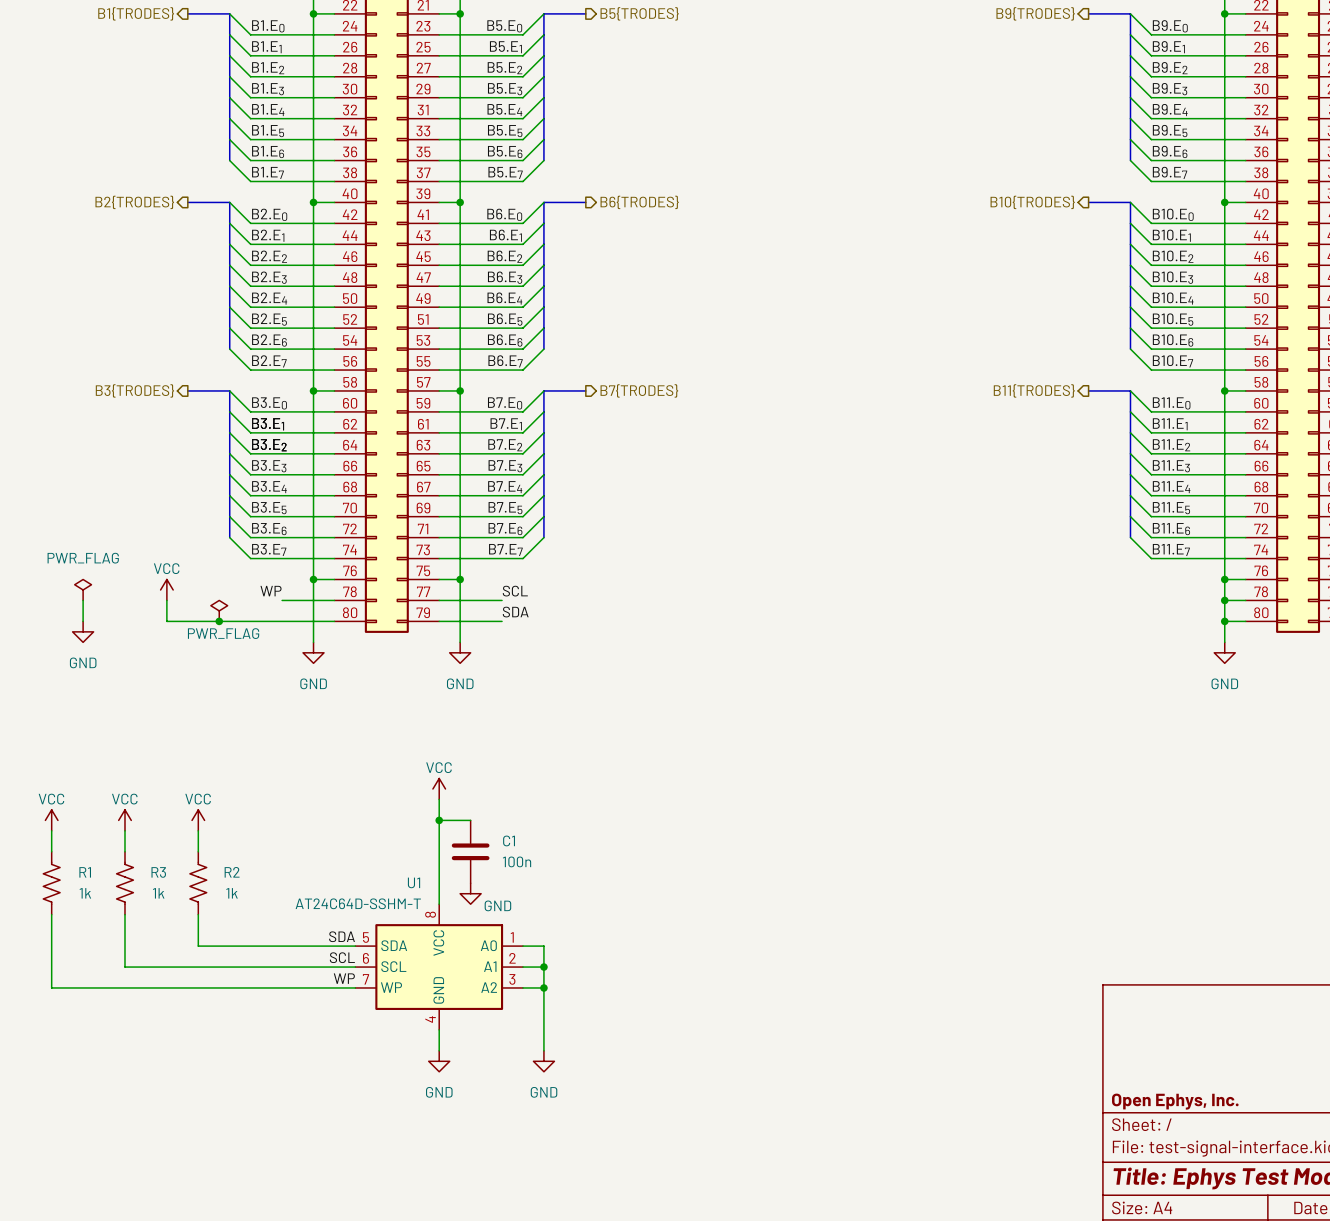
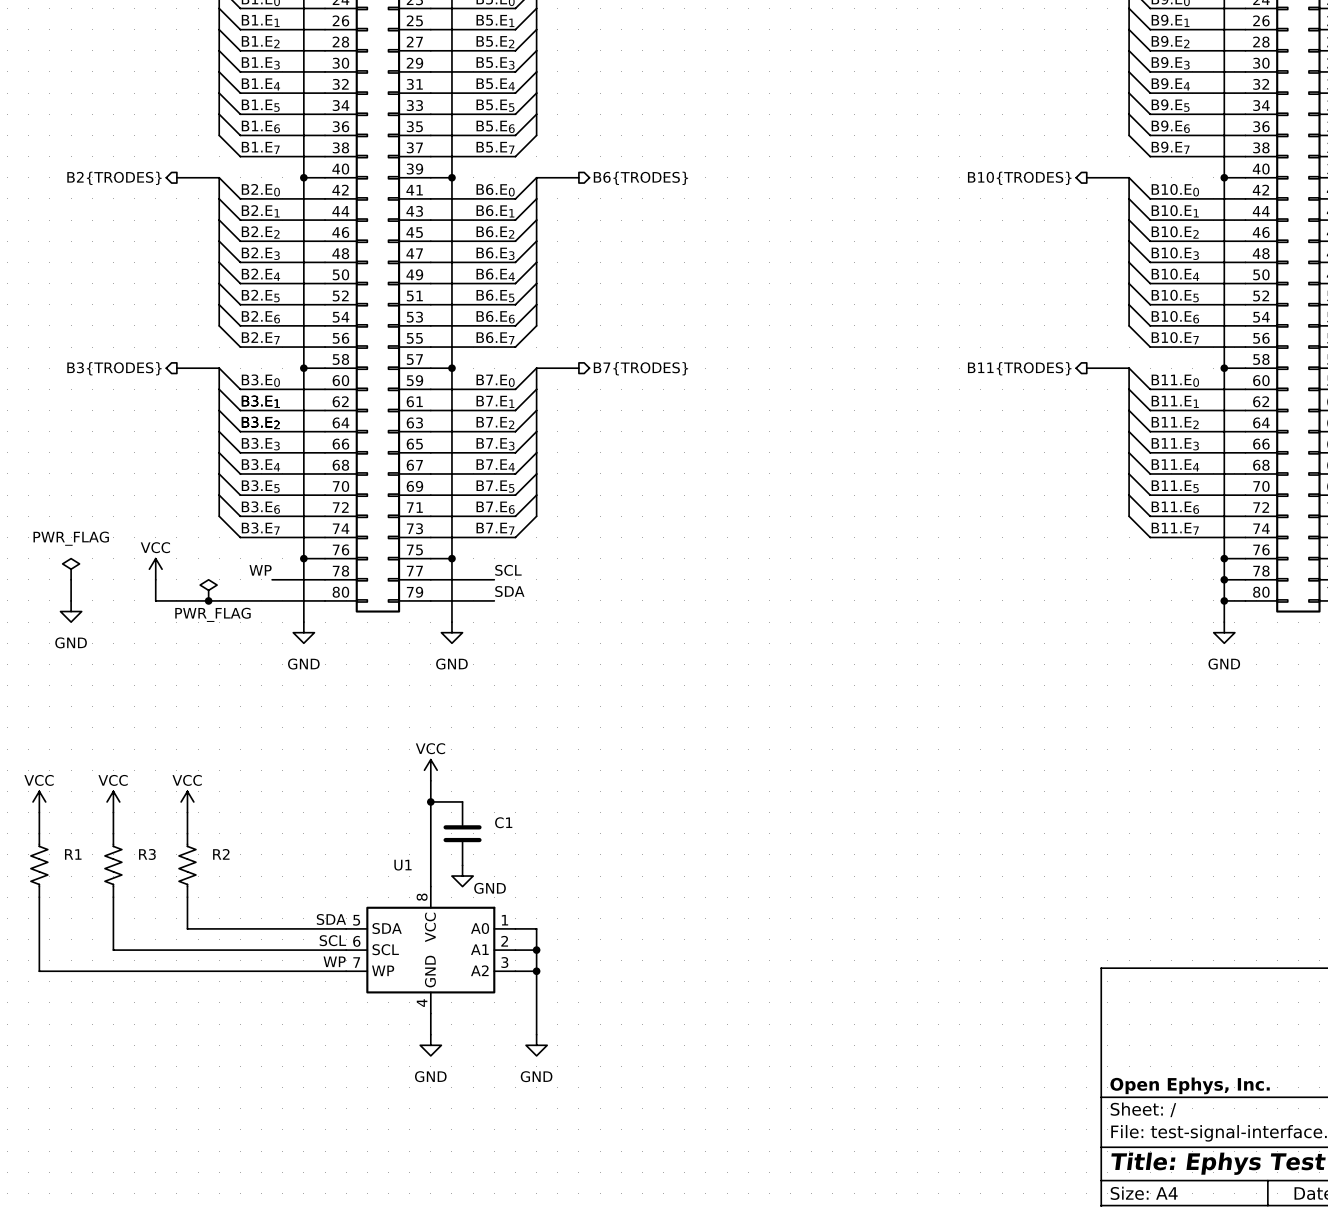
C1 value: 100n (517, 861) -> none
R1 value: 1k (85, 893) -> none
R3 value: 1k (158, 893) -> none
R2 value: 1k (232, 893) -> none
U1 value: AT24C64D-SSHM-T (358, 903) -> none

